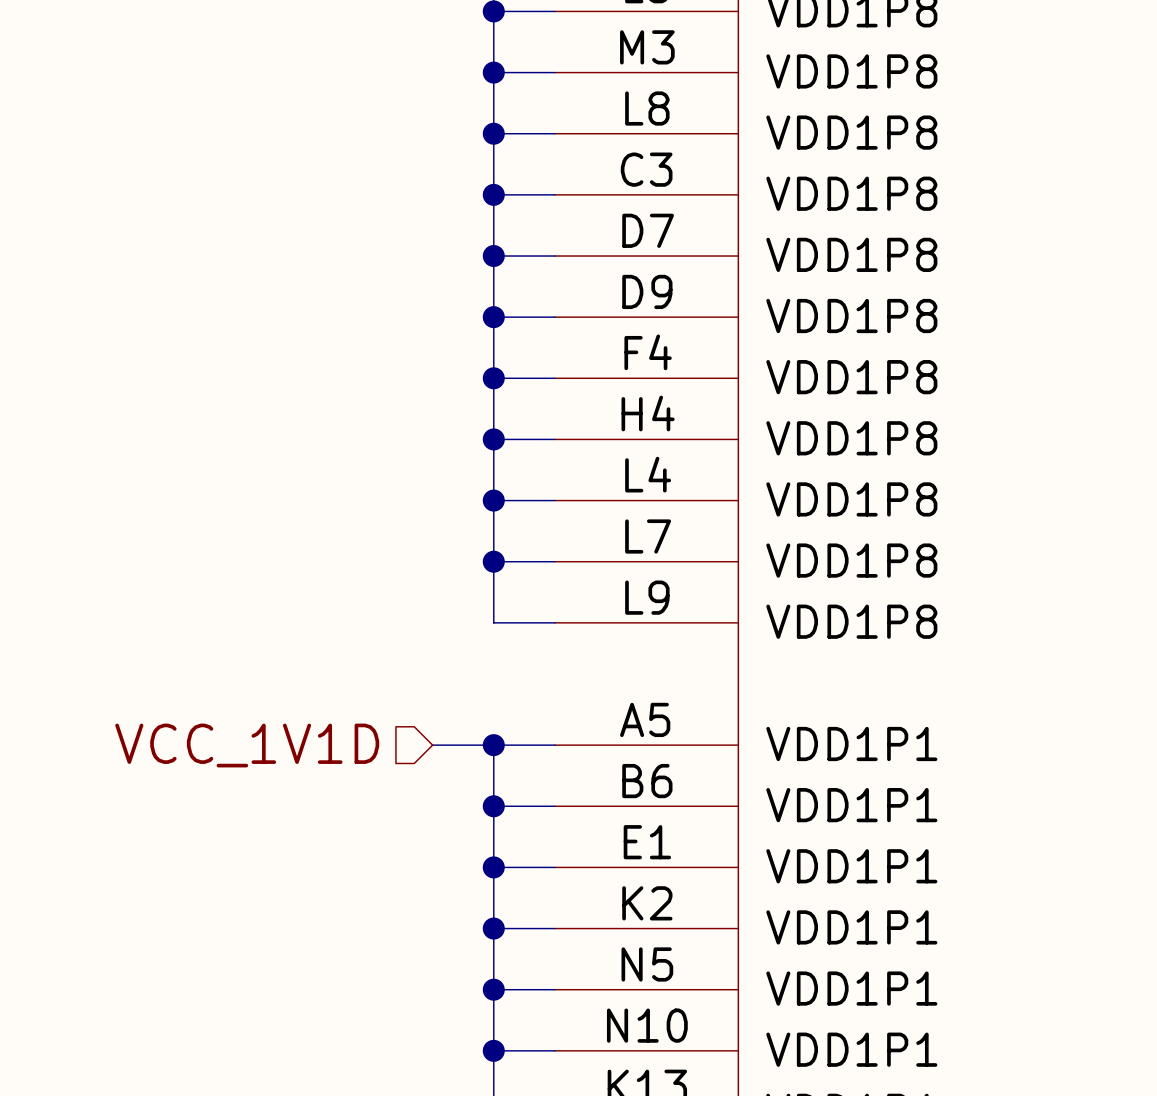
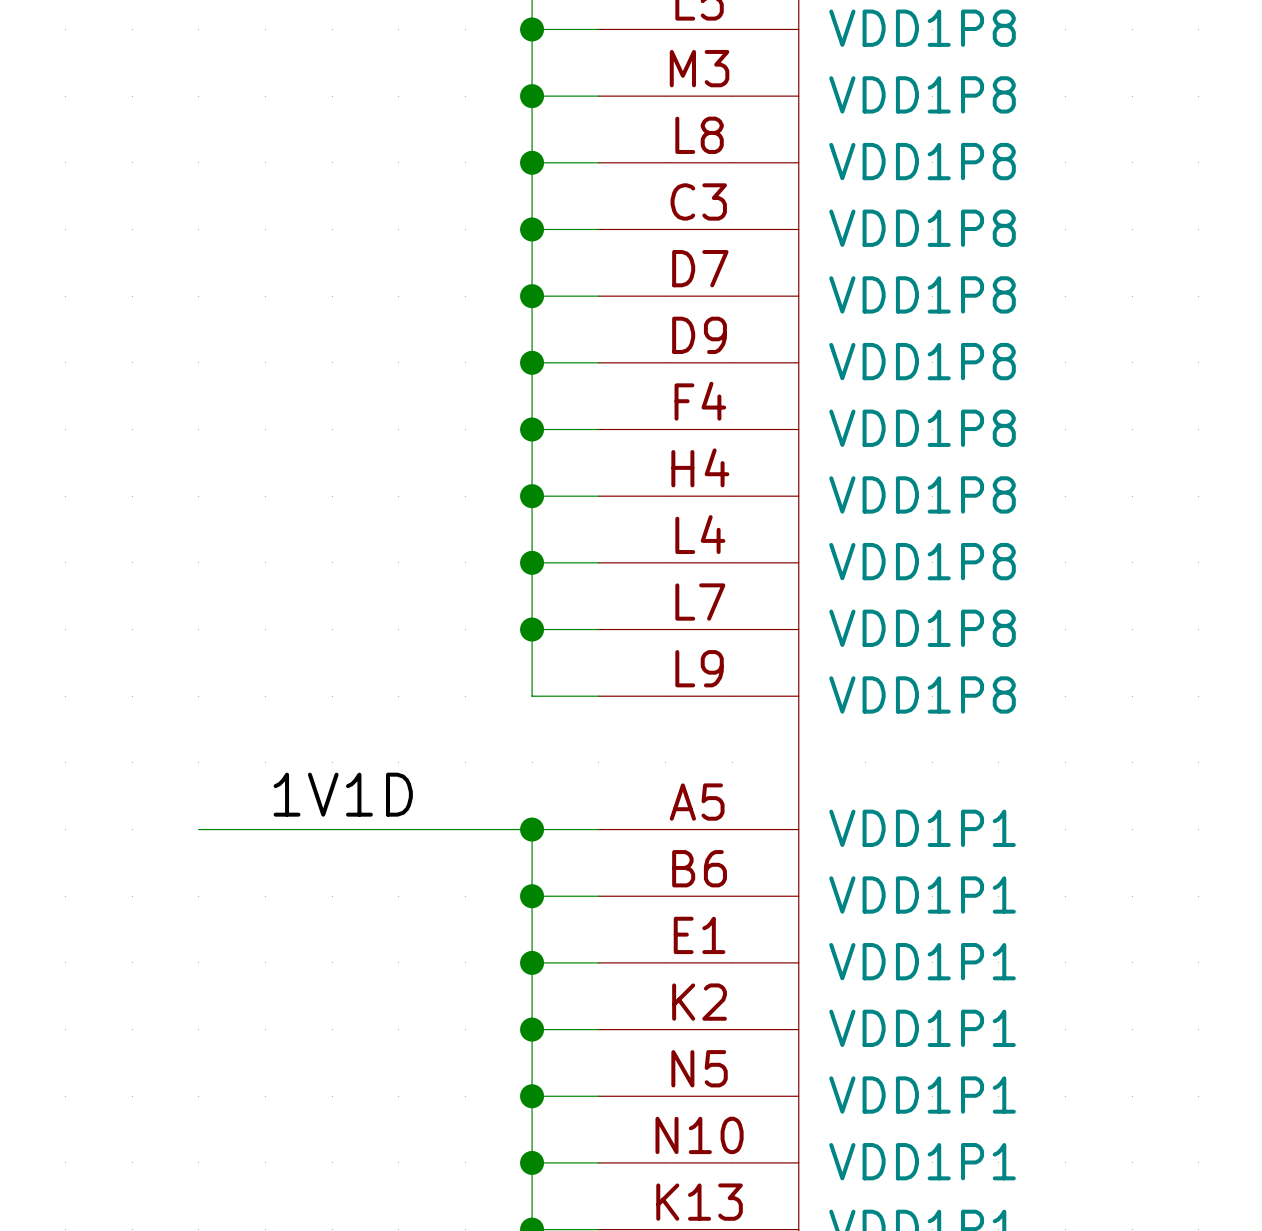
label: none -> 1V1D (343, 794)
wire: none -> (198, 829) (465, 829)
hierarchical label: VCC_1V1D (247, 745) -> none

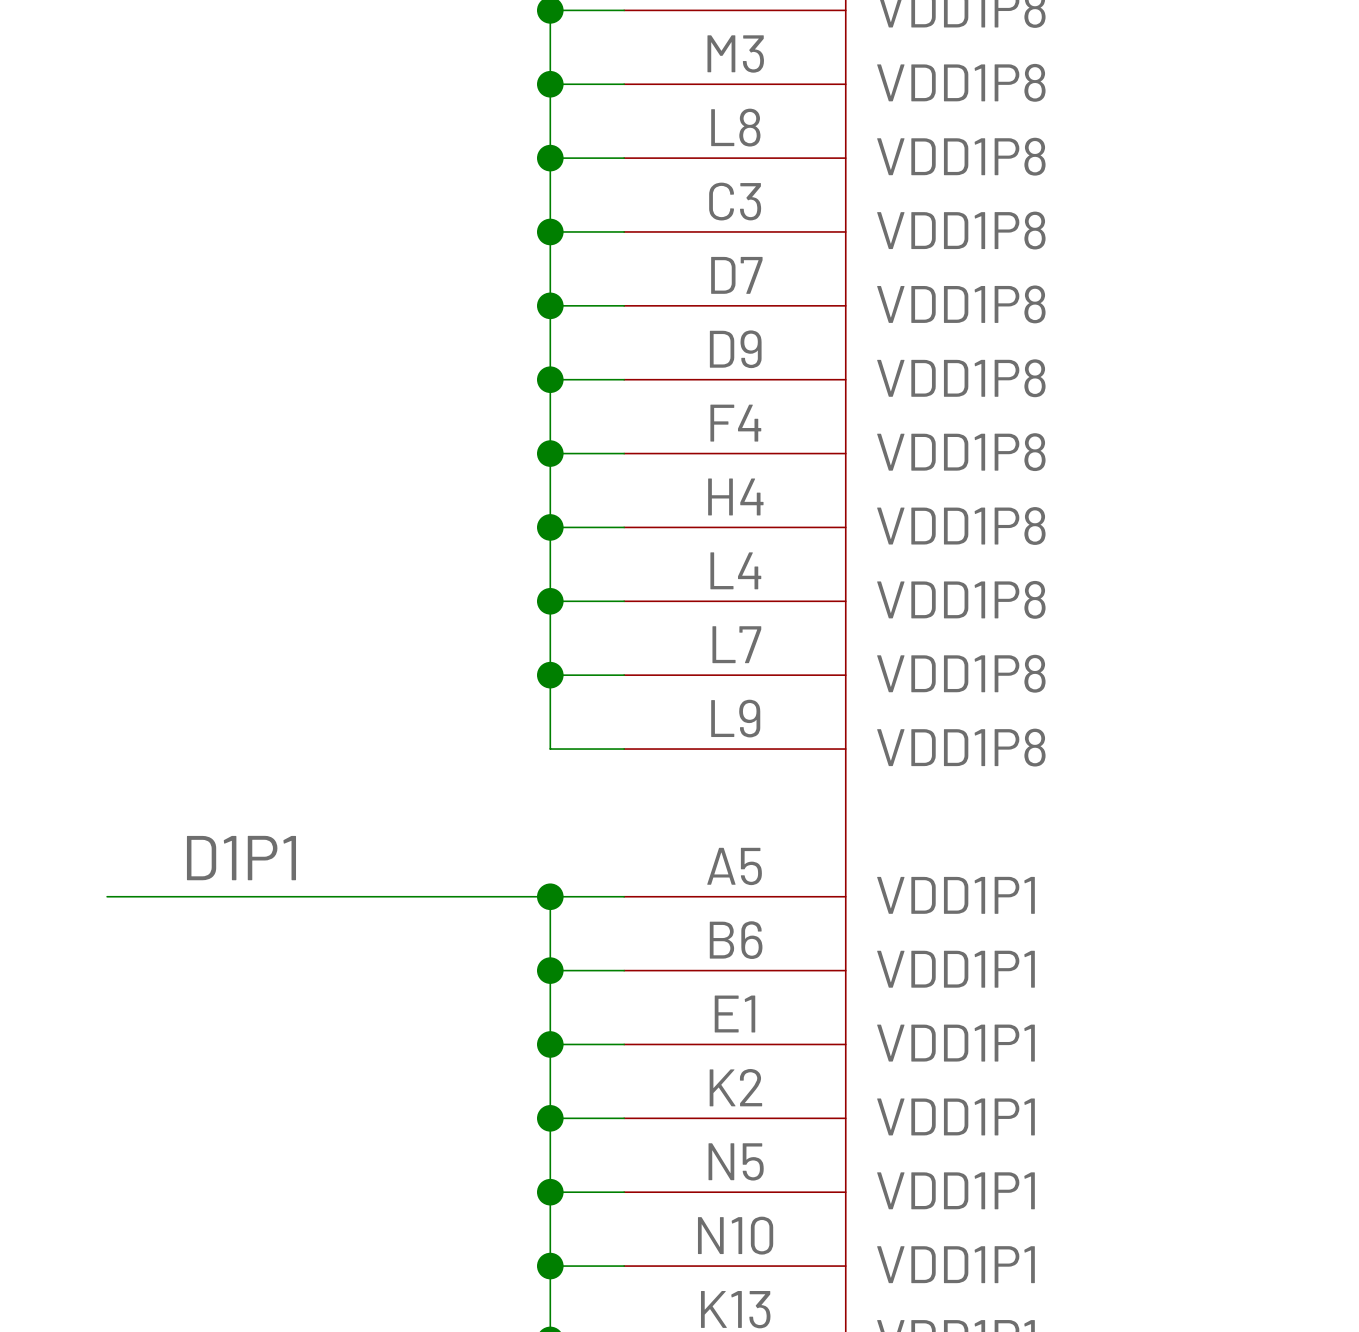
label: none -> D1P1 (241, 858)
label: 1V1D (343, 794) -> none
wire: none -> (107, 896) (180, 896)

